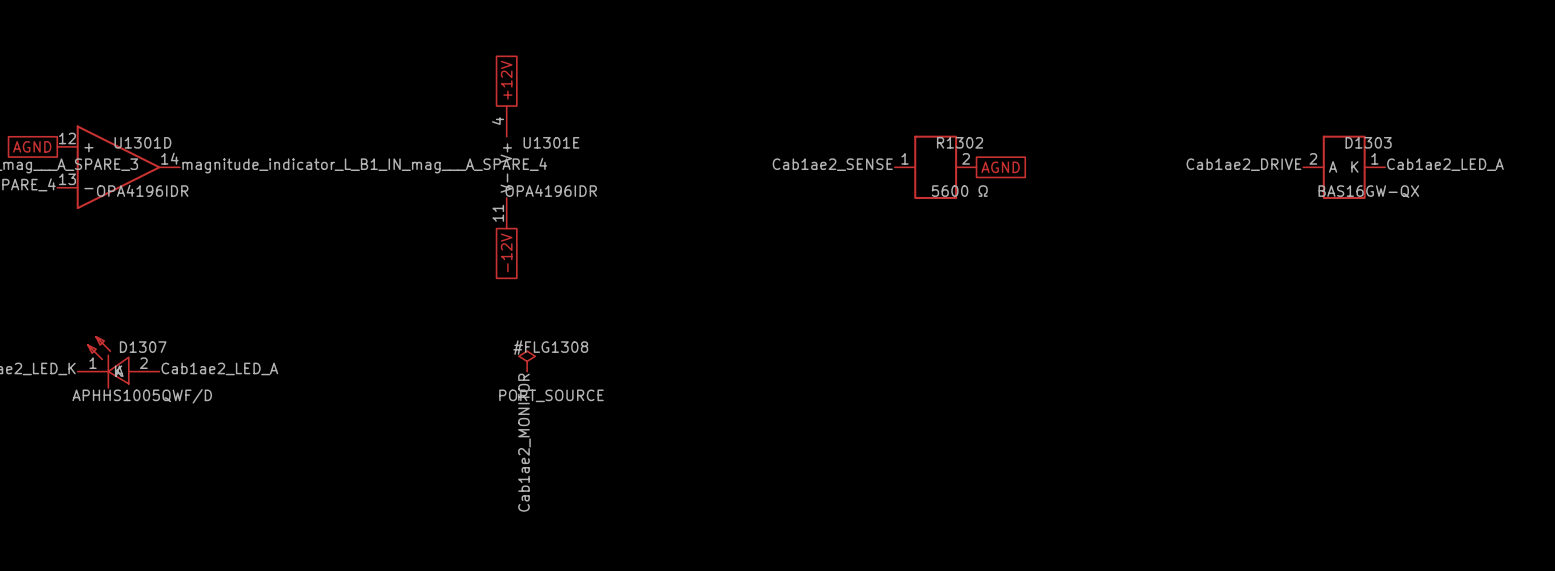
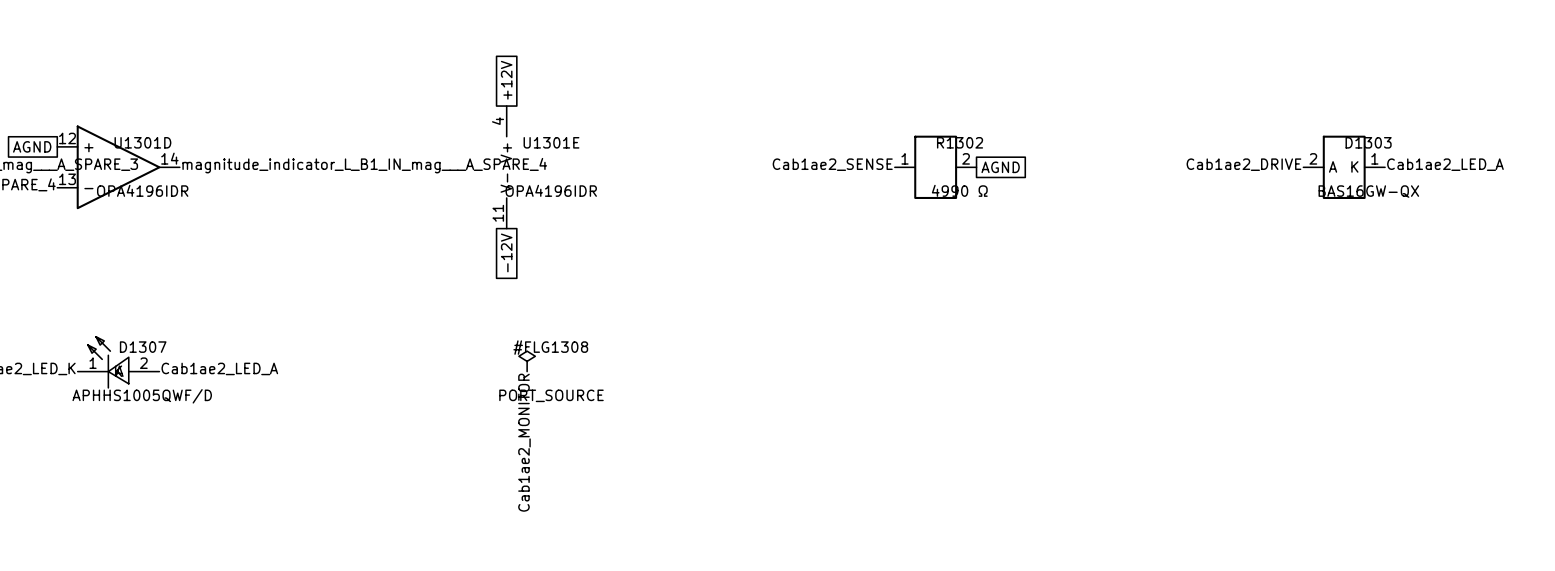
R1302 value: 5600 Ω (959, 191) -> 4990 Ω (959, 190)

